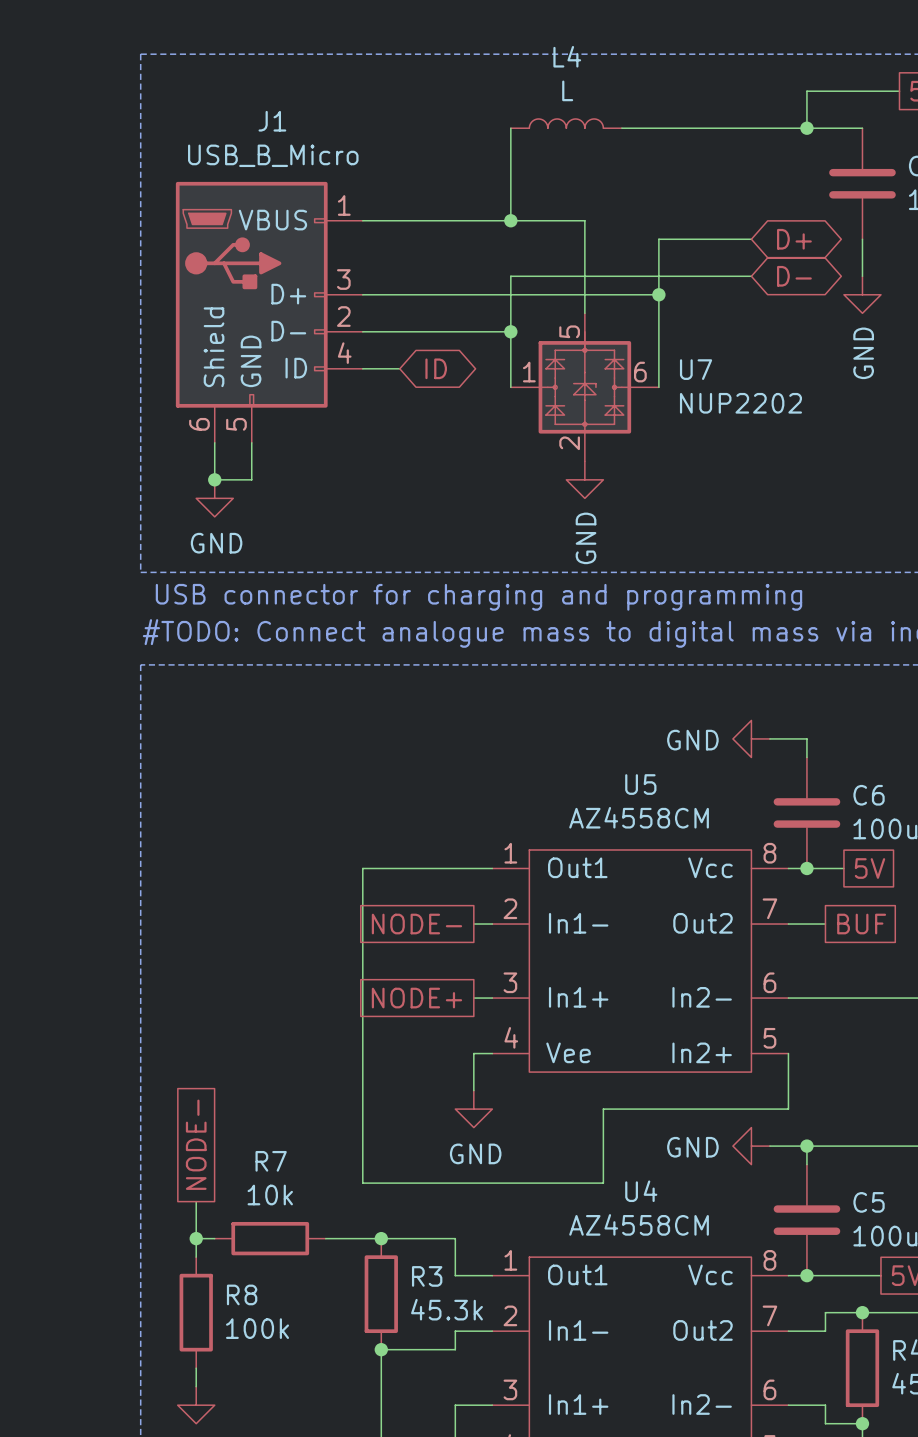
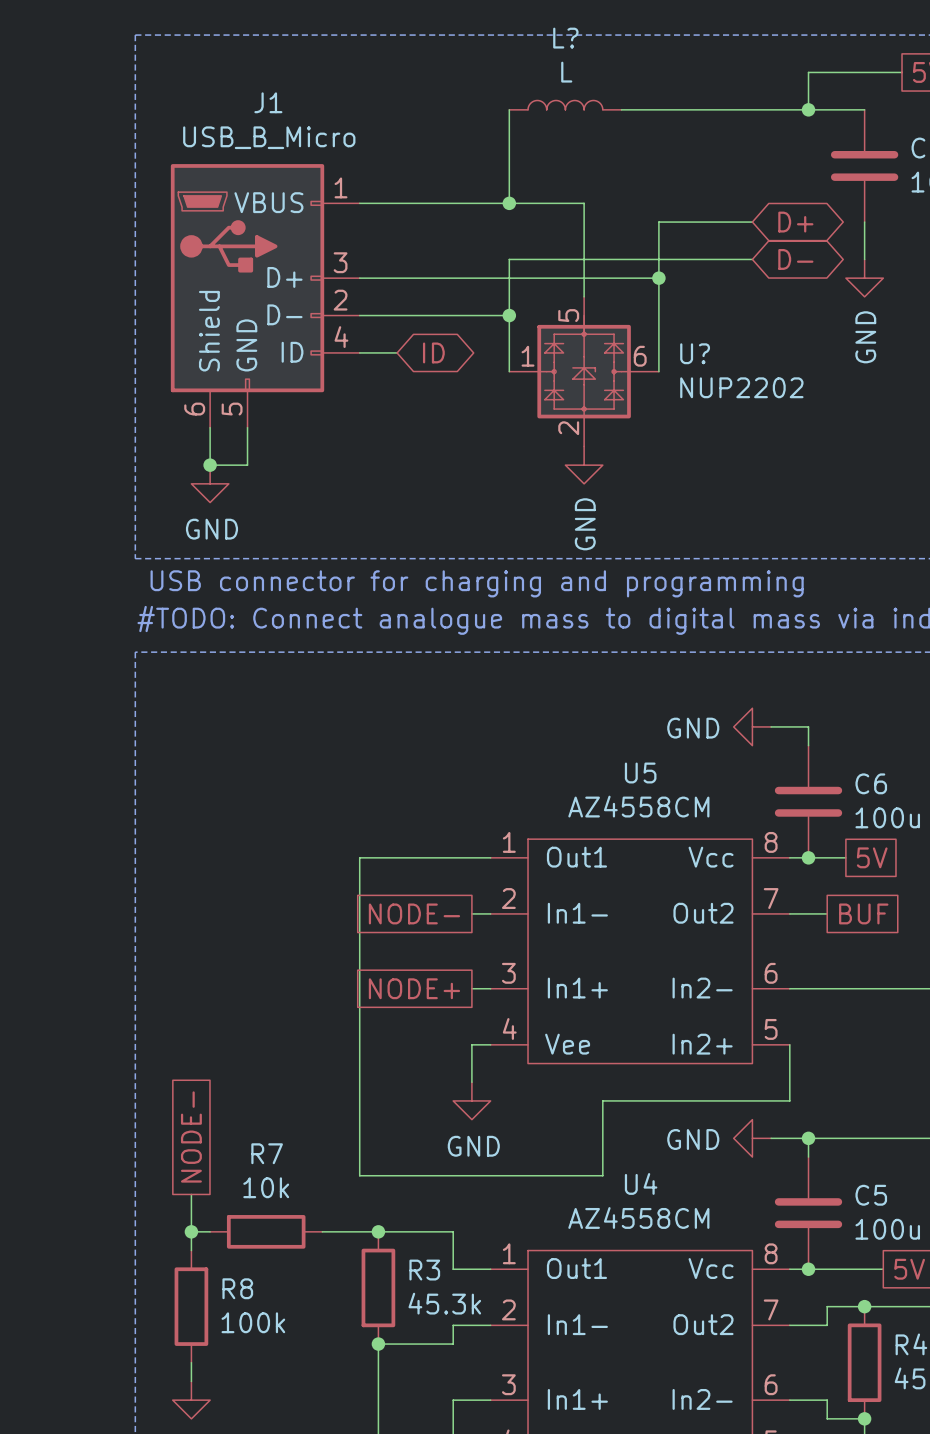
L4 name: L4 (567, 56) -> L? (565, 38)
U7 name: U7 (696, 369) -> U? (695, 353)

